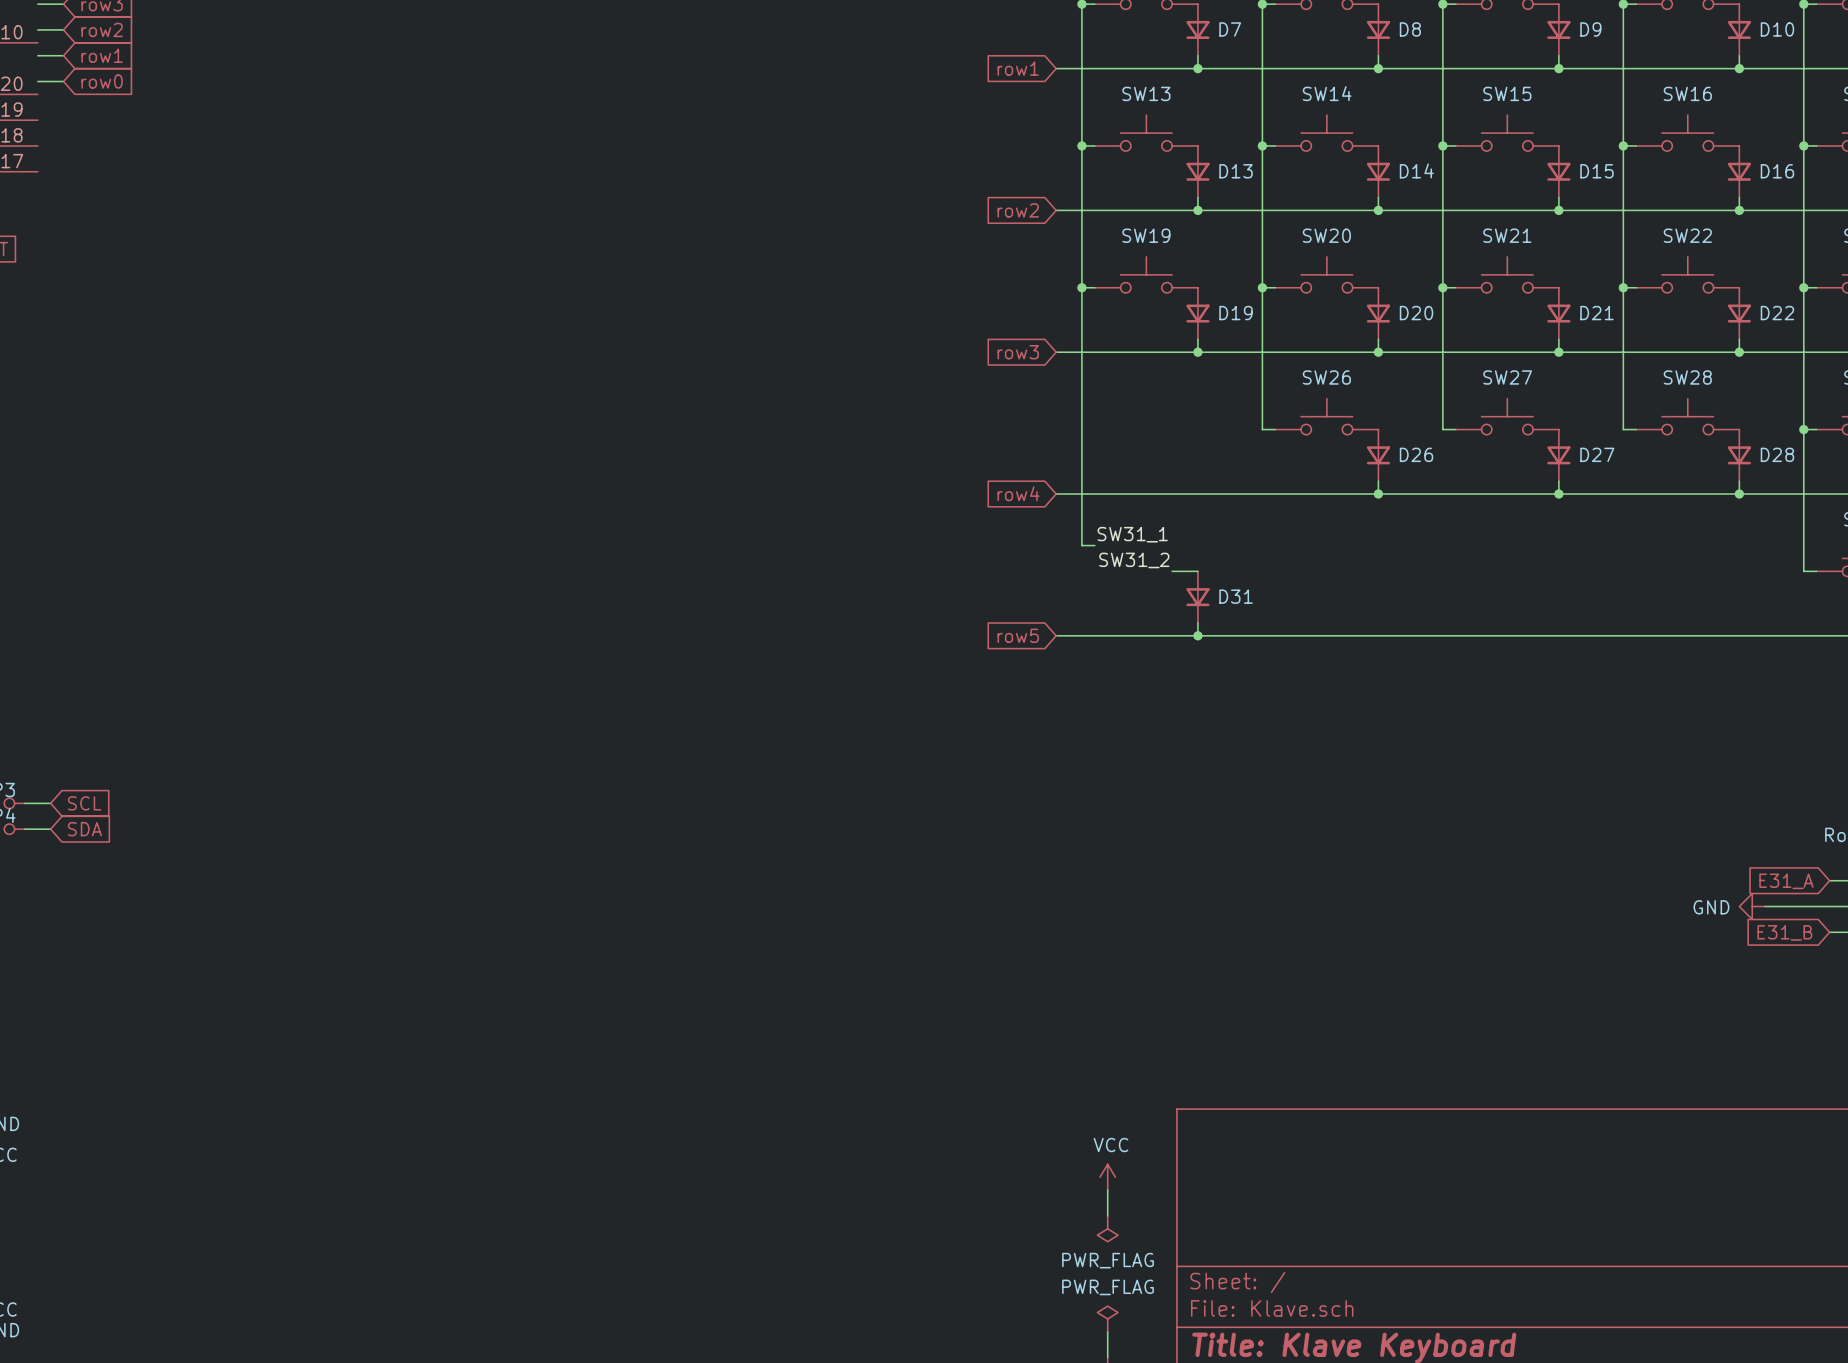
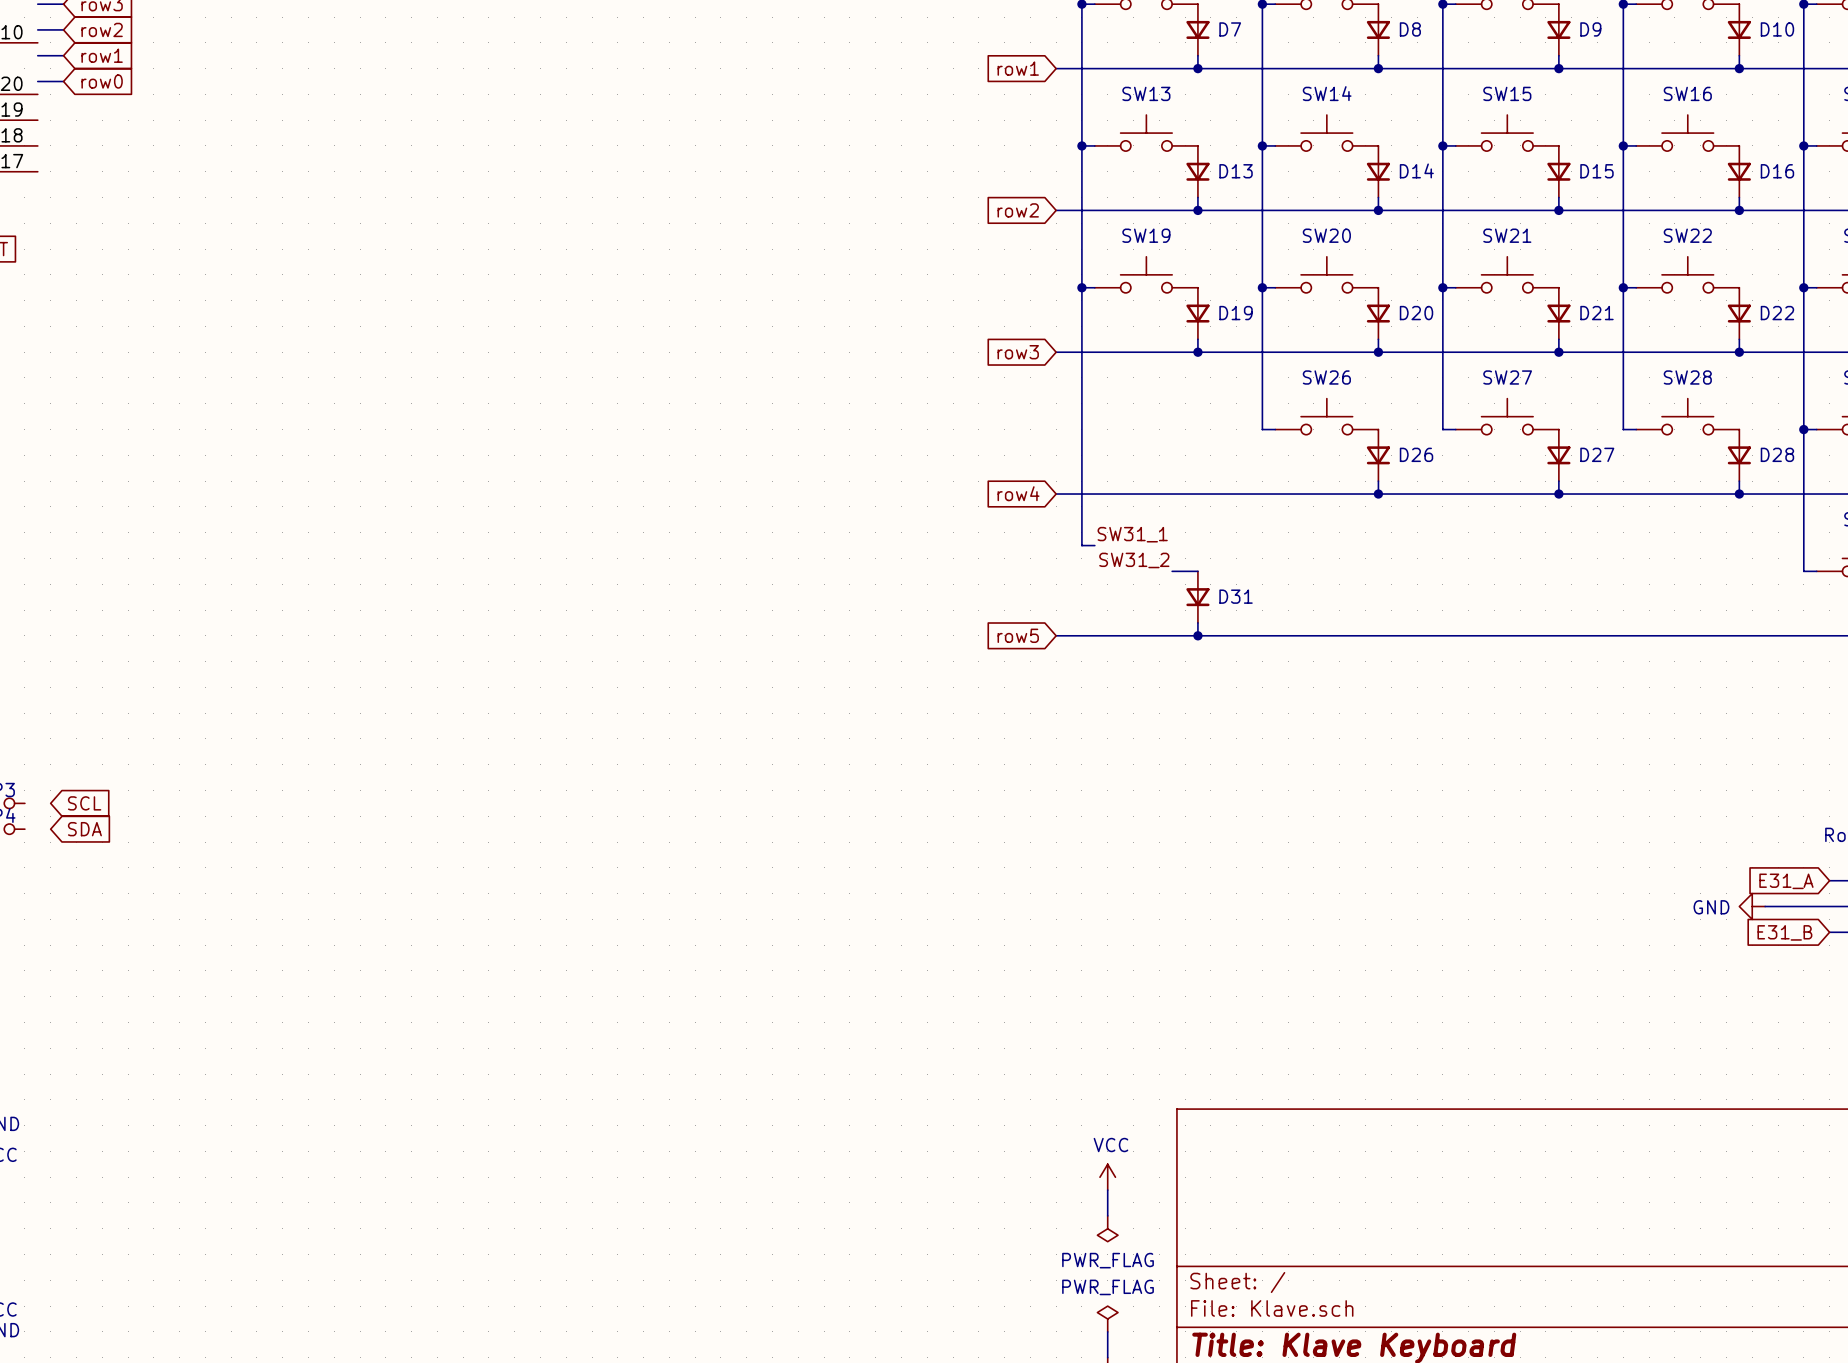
wire: (24, 803) (50, 803) -> none
wire: (24, 829) (50, 829) -> none

